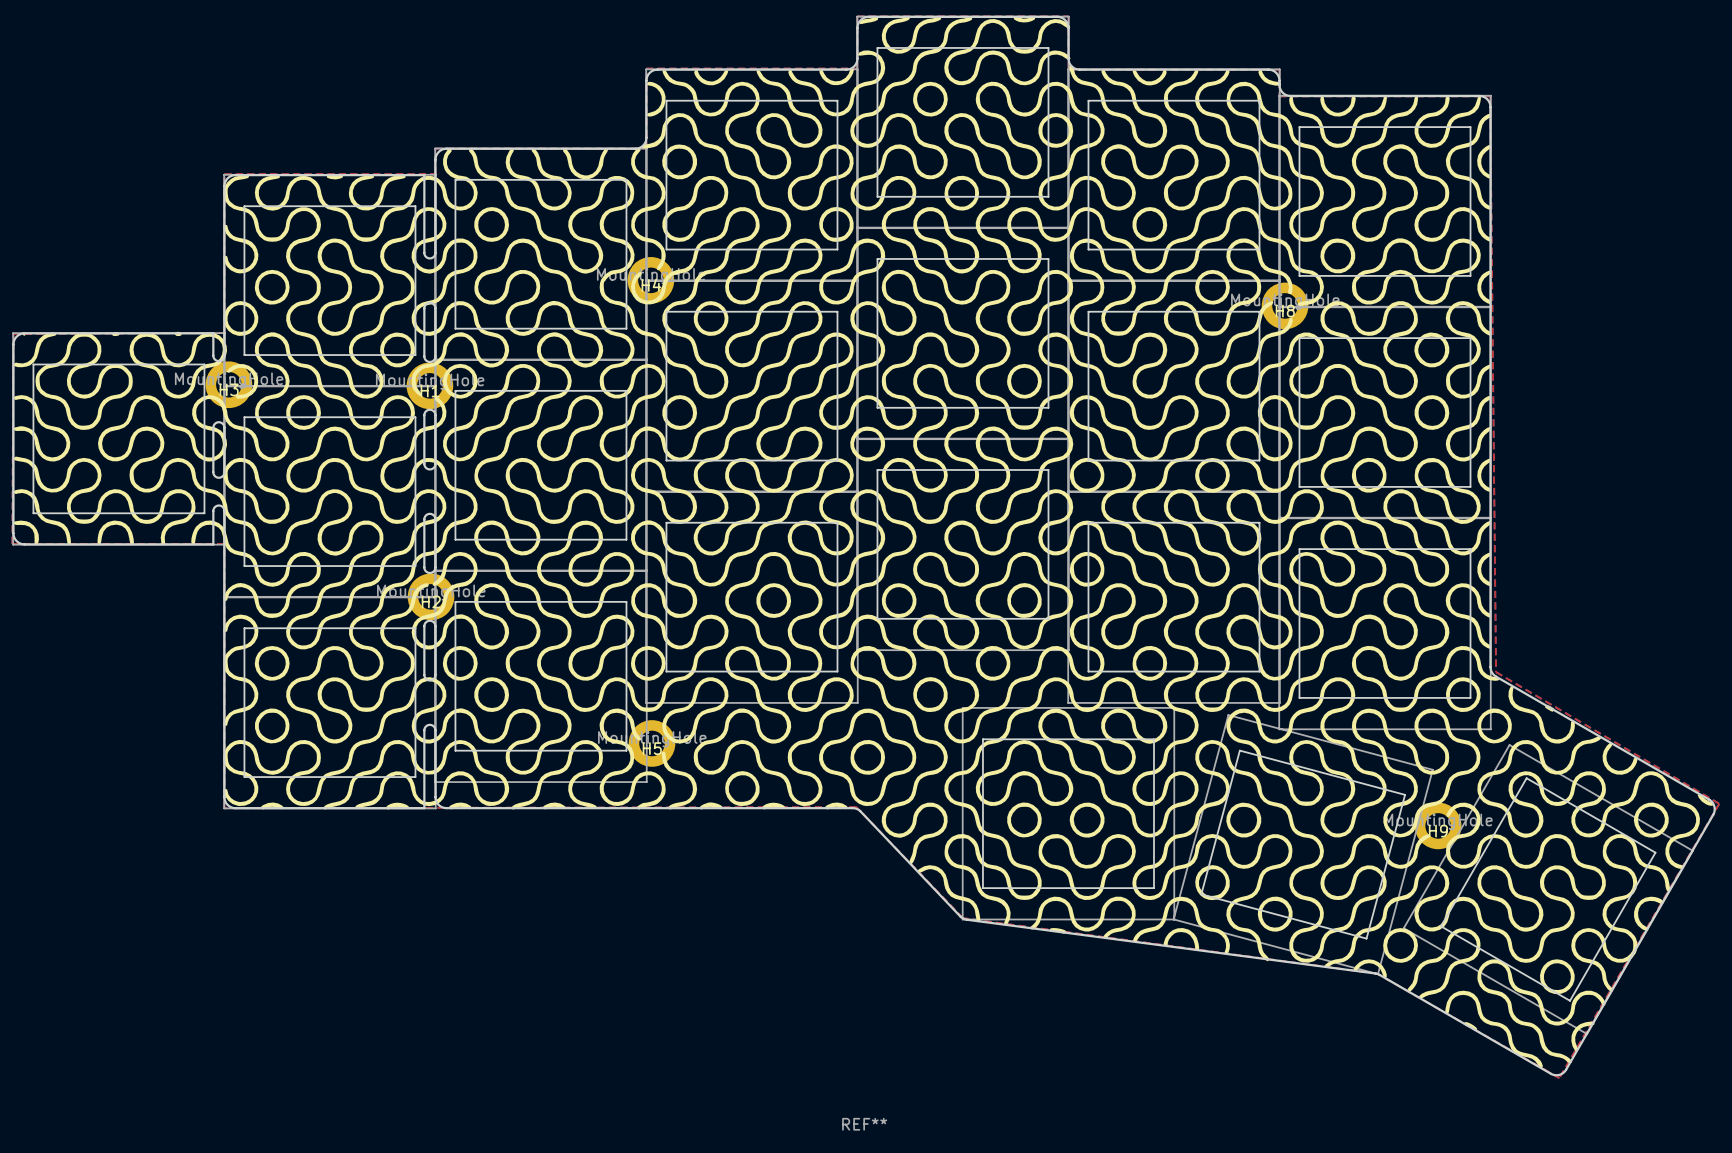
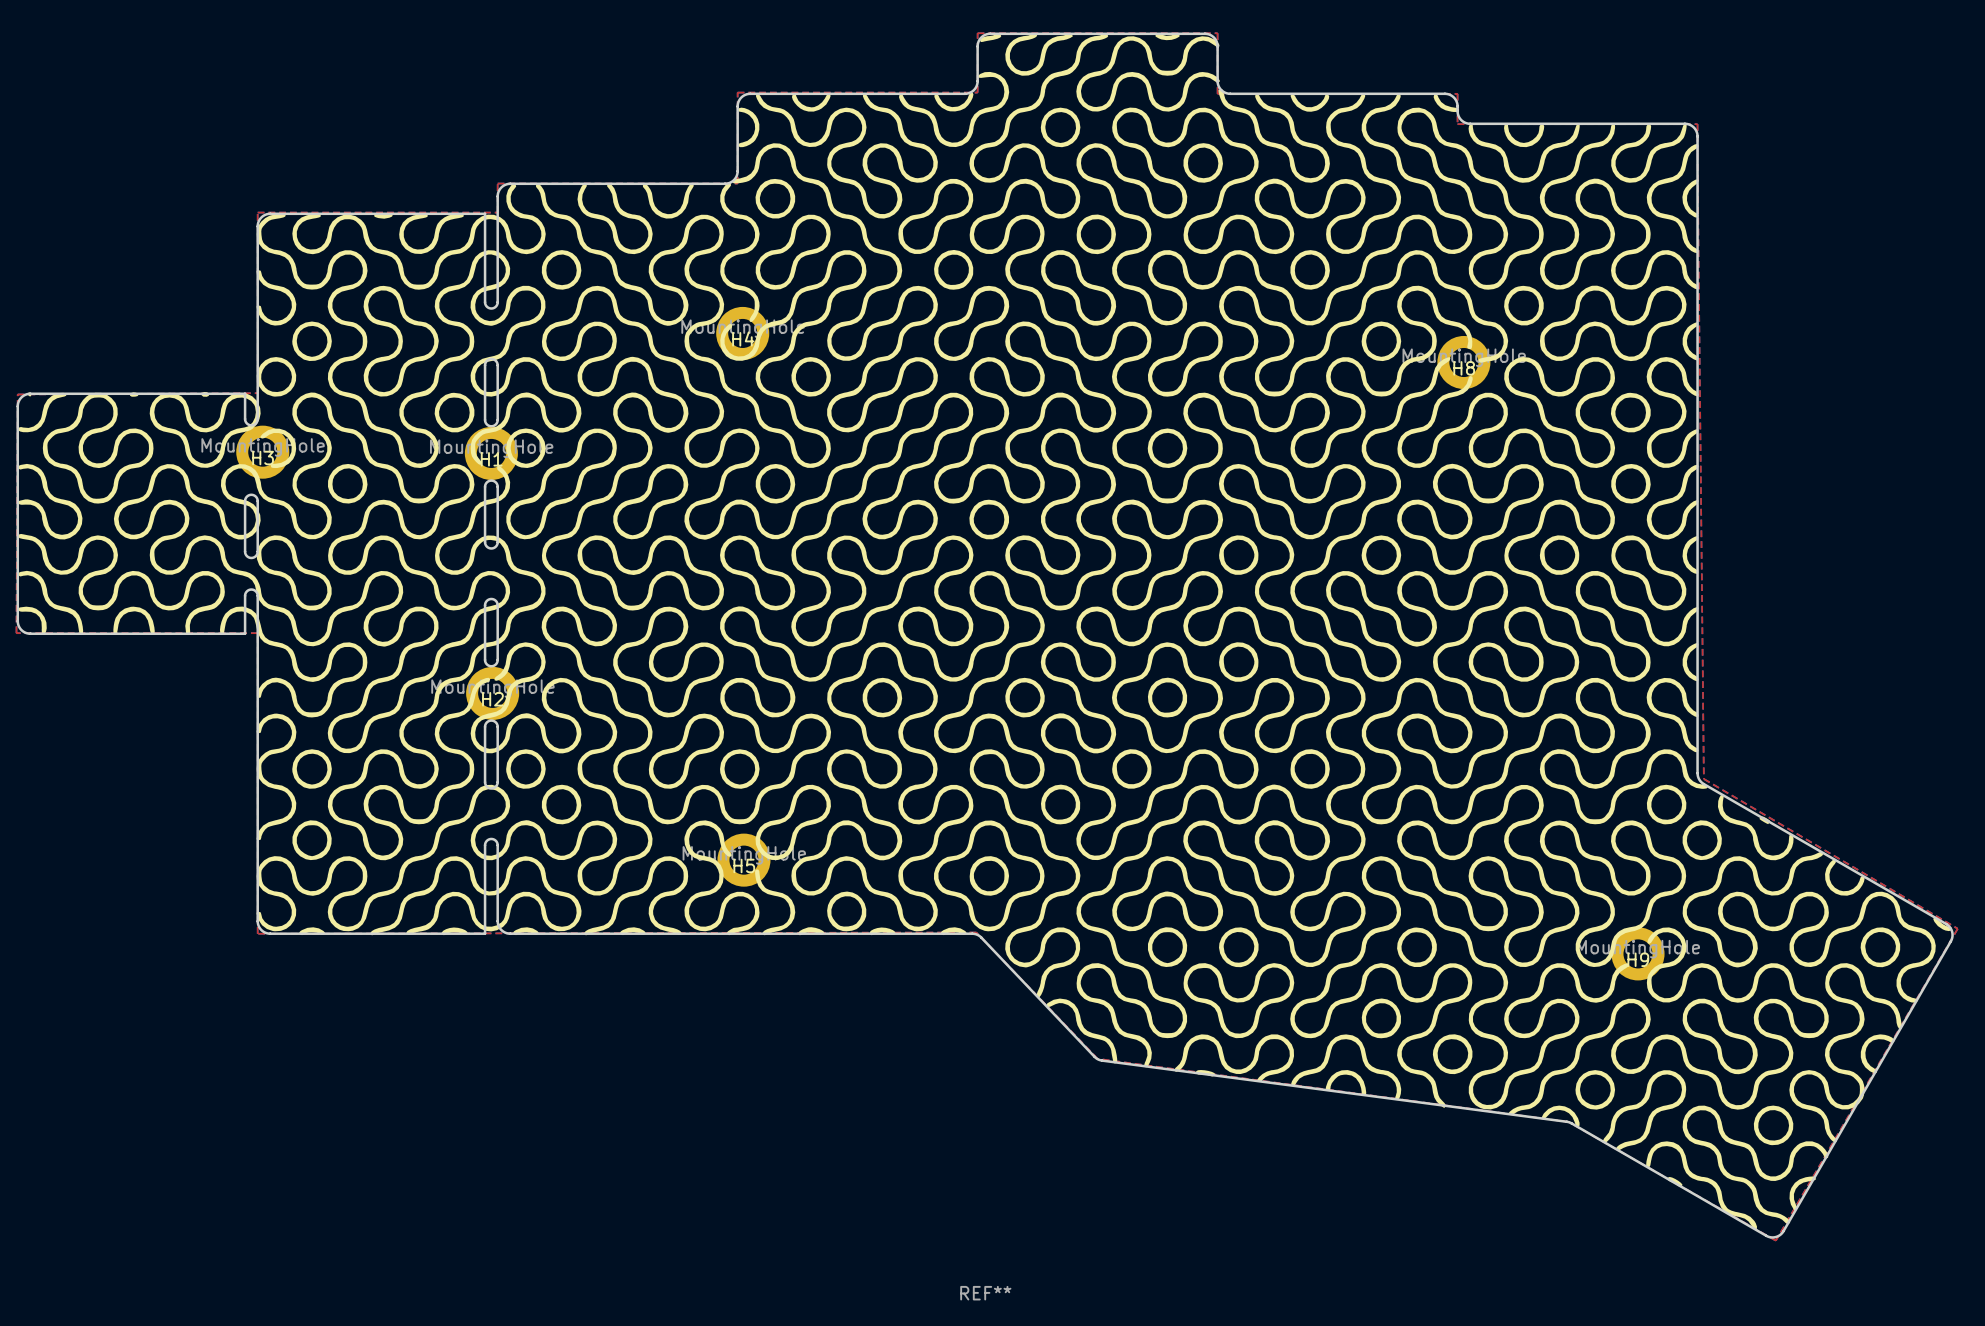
drawing: [12, 15, 1694, 1035] -> none

